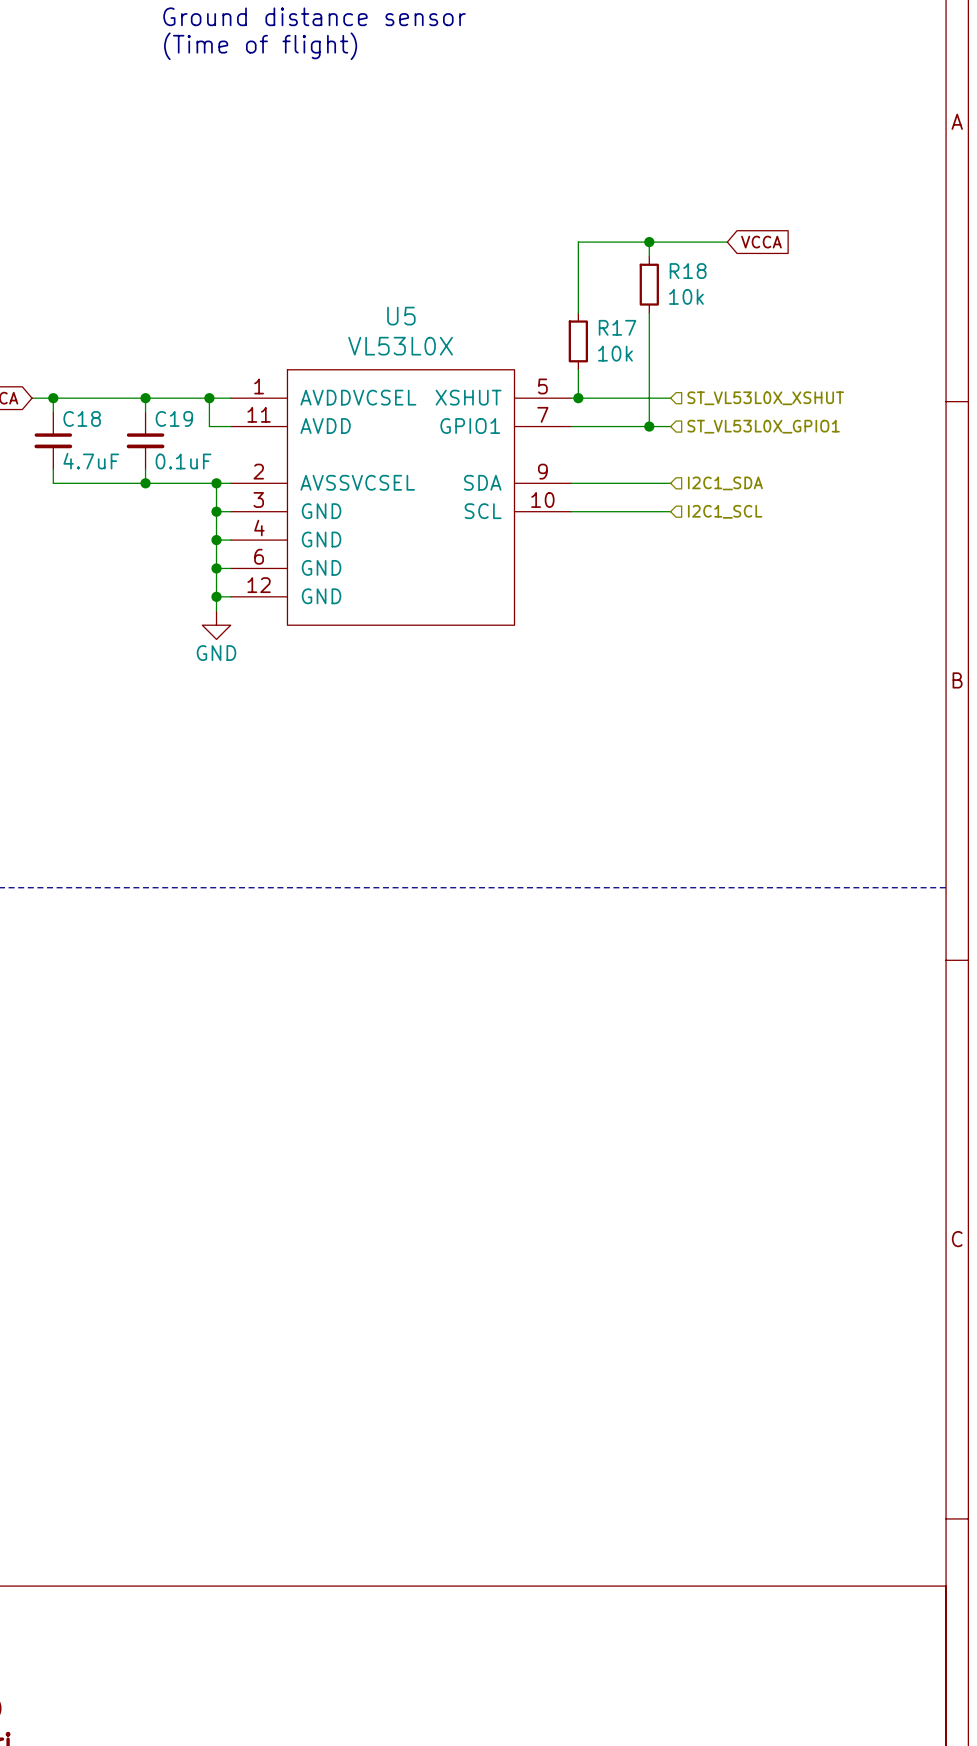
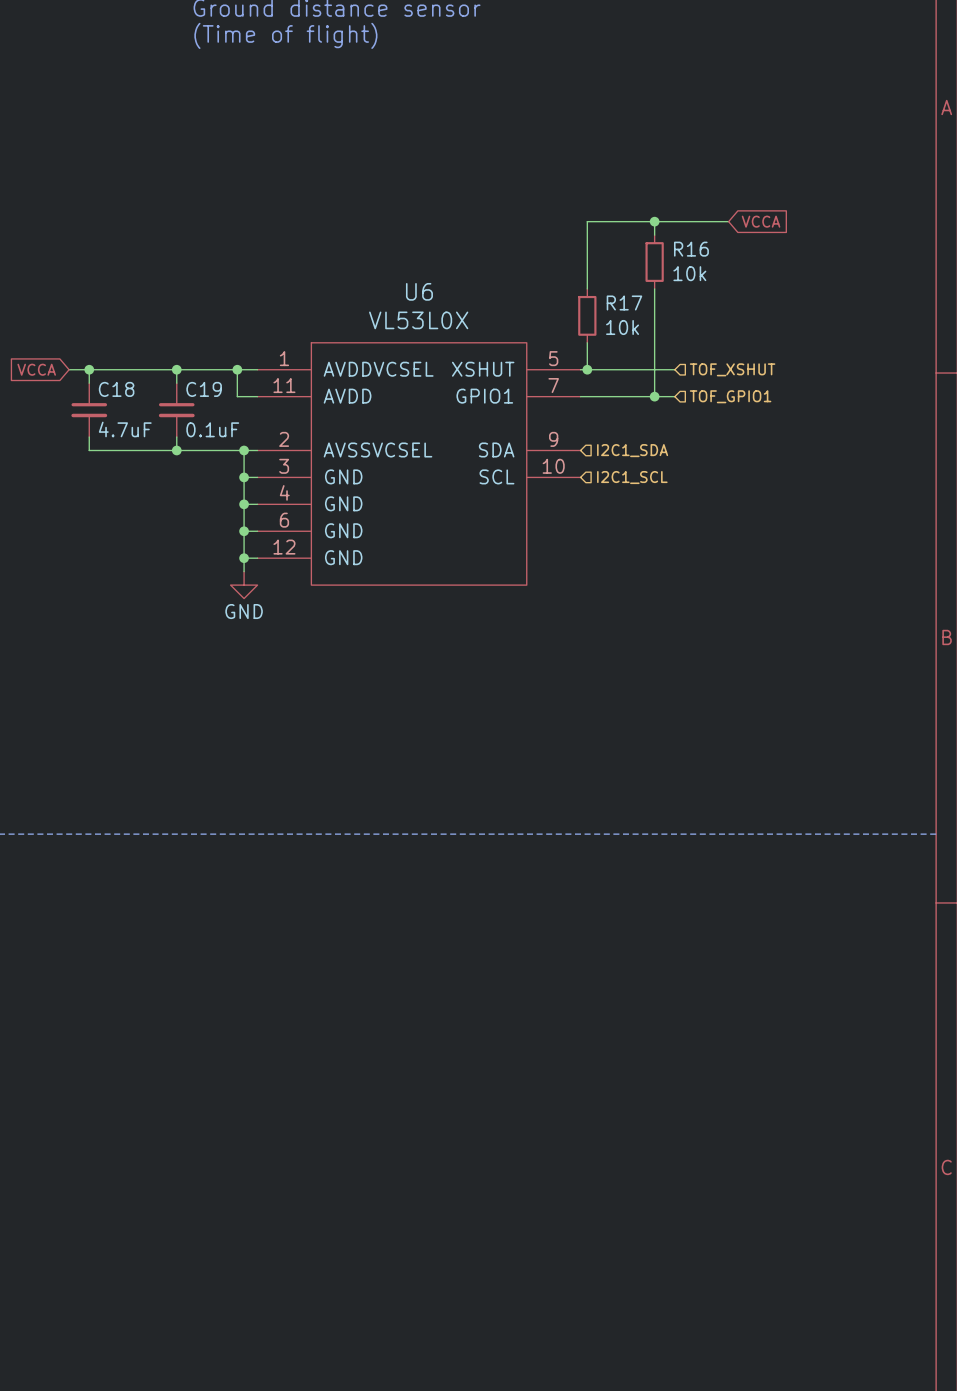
R18 name: R18 (688, 271) -> R16 (691, 249)
U5 name: U5 (401, 316) -> U6 (419, 291)
hierarchical label: ST_VL53L0X_XSHUT (765, 398) -> TOF_XSHUT (732, 369)
hierarchical label: ST_VL53L0X_GPIO1 (763, 426) -> TOF_GPIO1 (730, 396)
wire: (571, 483) (670, 483) -> none
hierarchical label position: I2C1_SDA (725, 483) -> I2C1_SDA (632, 450)
wire: (571, 511) (670, 511) -> none
hierarchical label position: I2C1_SCL (725, 511) -> I2C1_SCL (632, 477)

